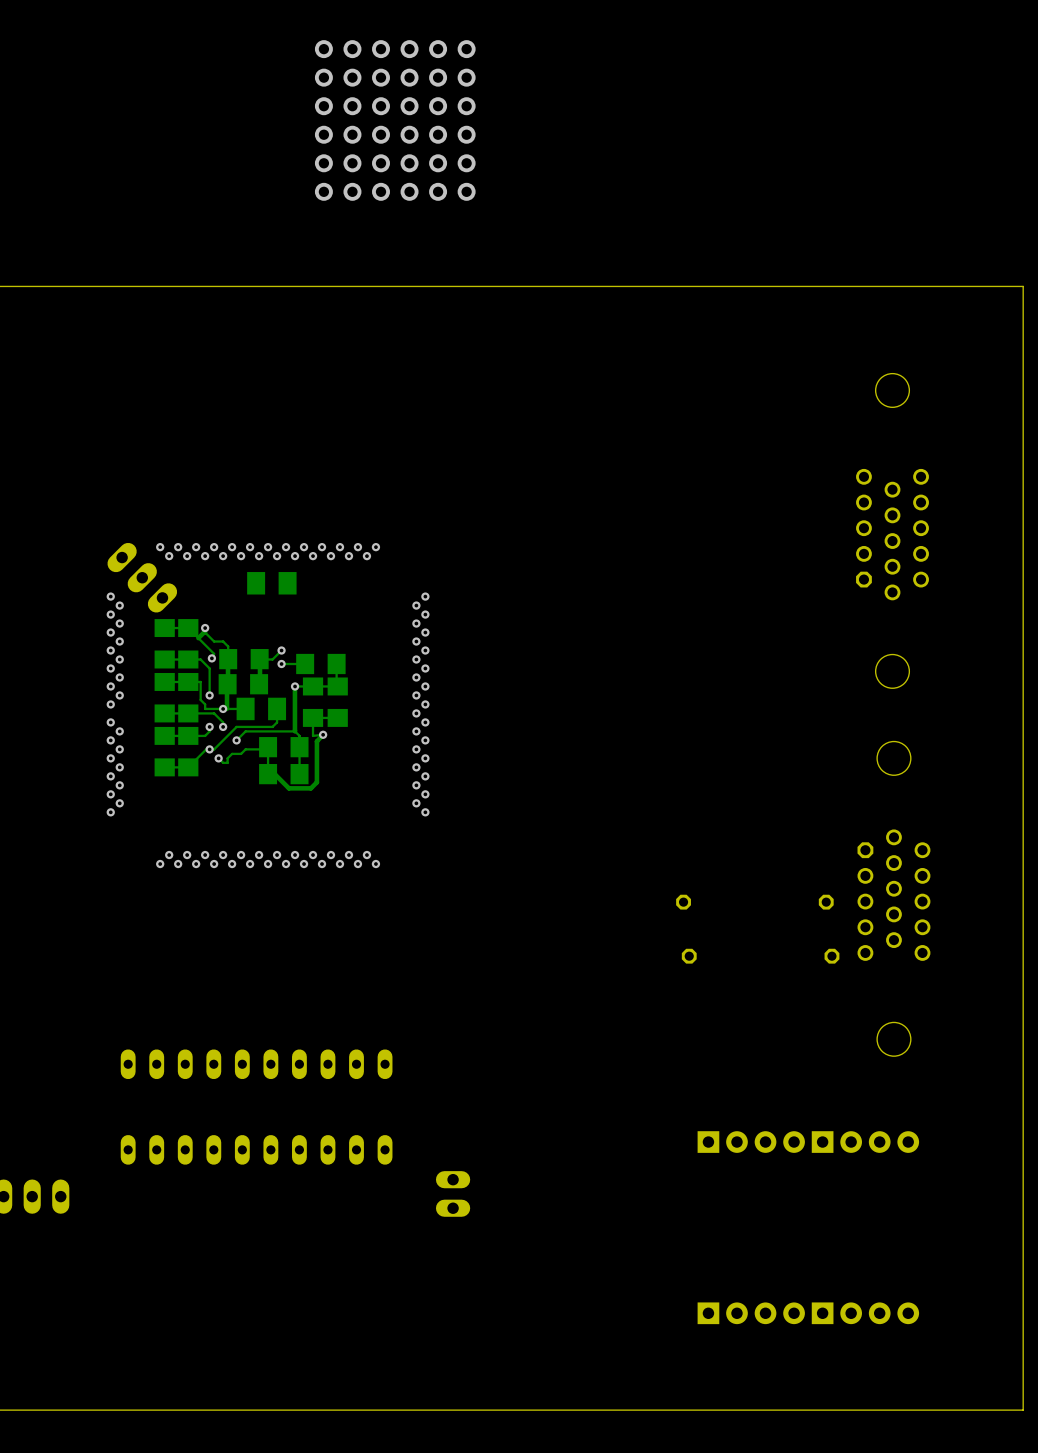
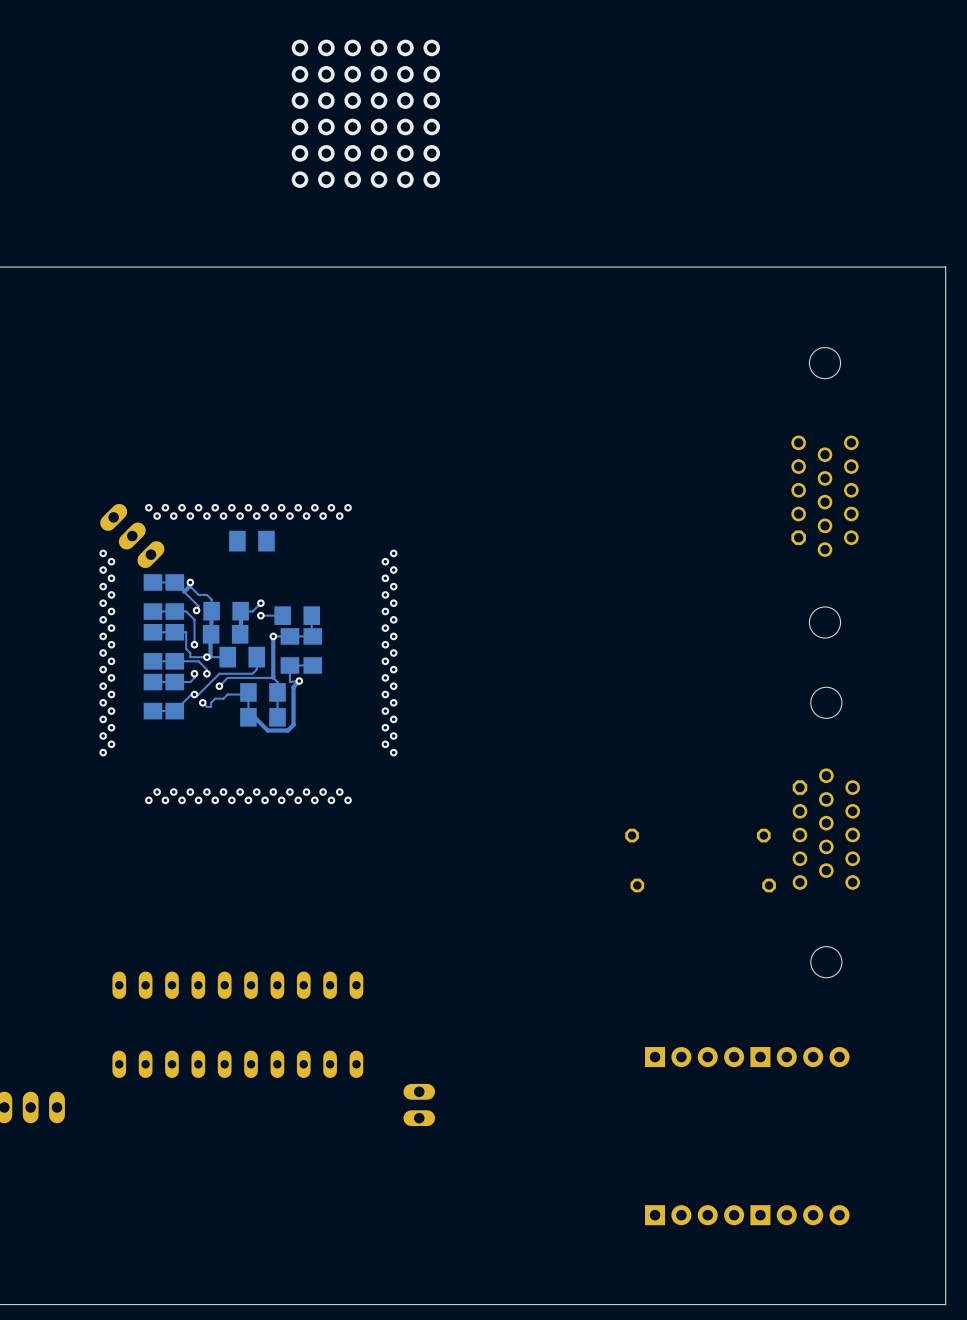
via: none -> (111, 661)

